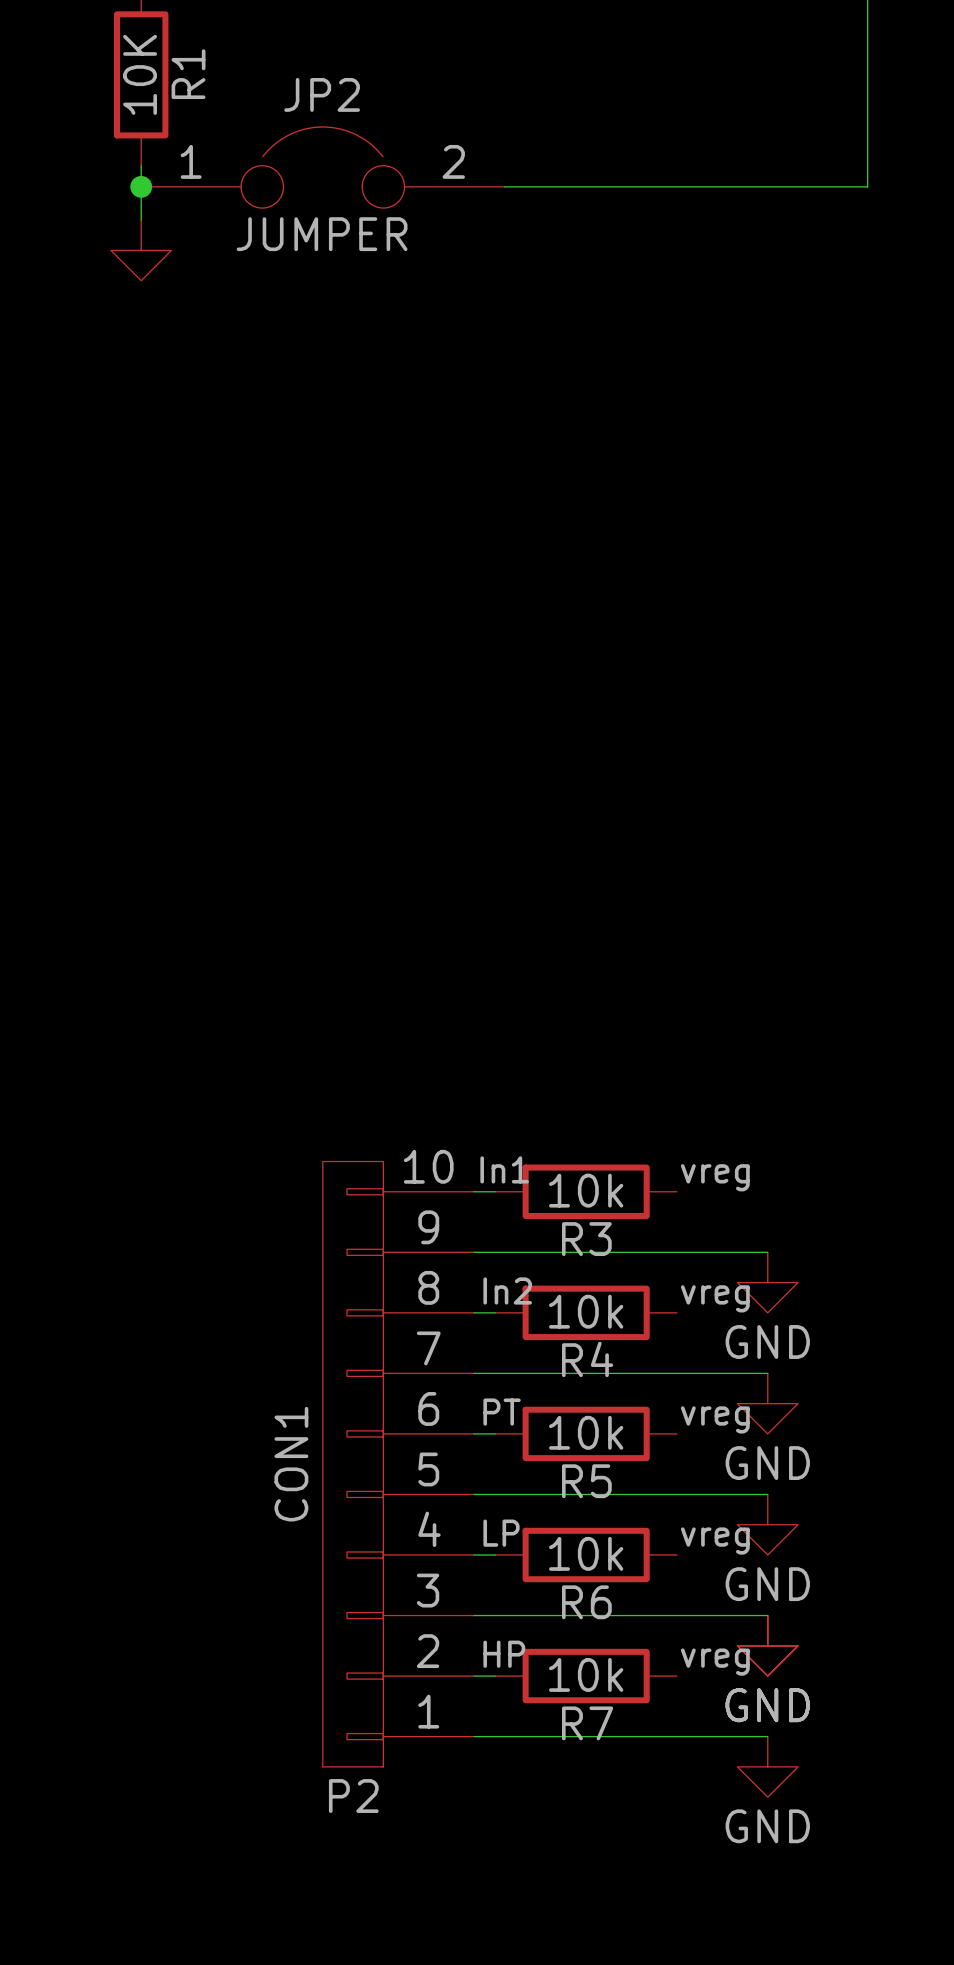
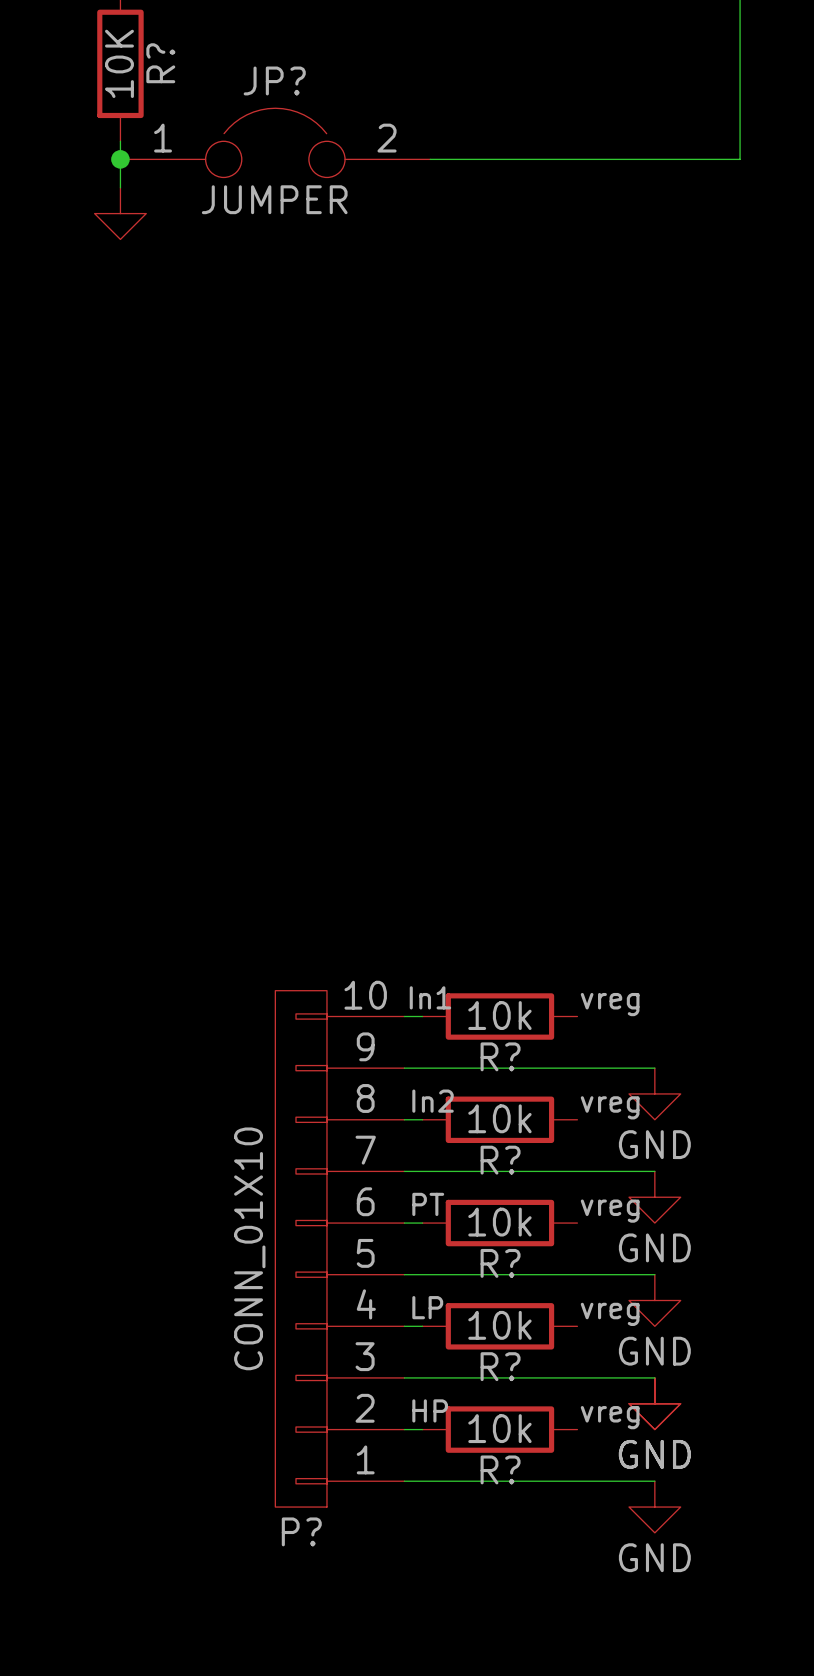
R1 name: R1 (188, 74) -> R? (160, 63)
JP2 name: JP2 (322, 94) -> JP? (274, 80)
R3 name: R3 (586, 1239) -> R? (500, 1056)
R4 name: R4 (587, 1359) -> R? (500, 1160)
P2 value: CON1 (291, 1464) -> CONN_01X10 (249, 1248)
R5 name: R5 (586, 1481) -> R? (500, 1263)
R6 name: R6 (586, 1602) -> R? (500, 1366)
R7 name: R7 (587, 1723) -> R? (500, 1469)
P2 name: P2 (353, 1796) -> P? (301, 1531)

